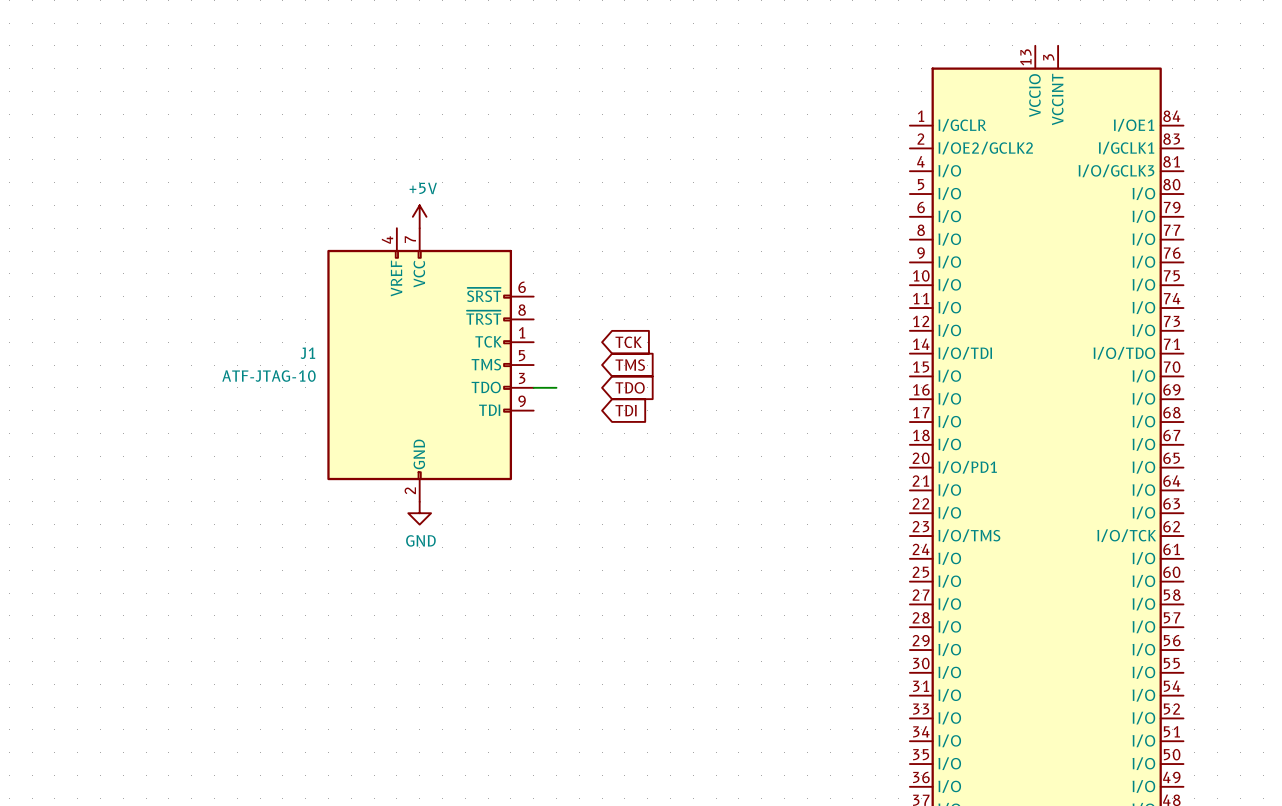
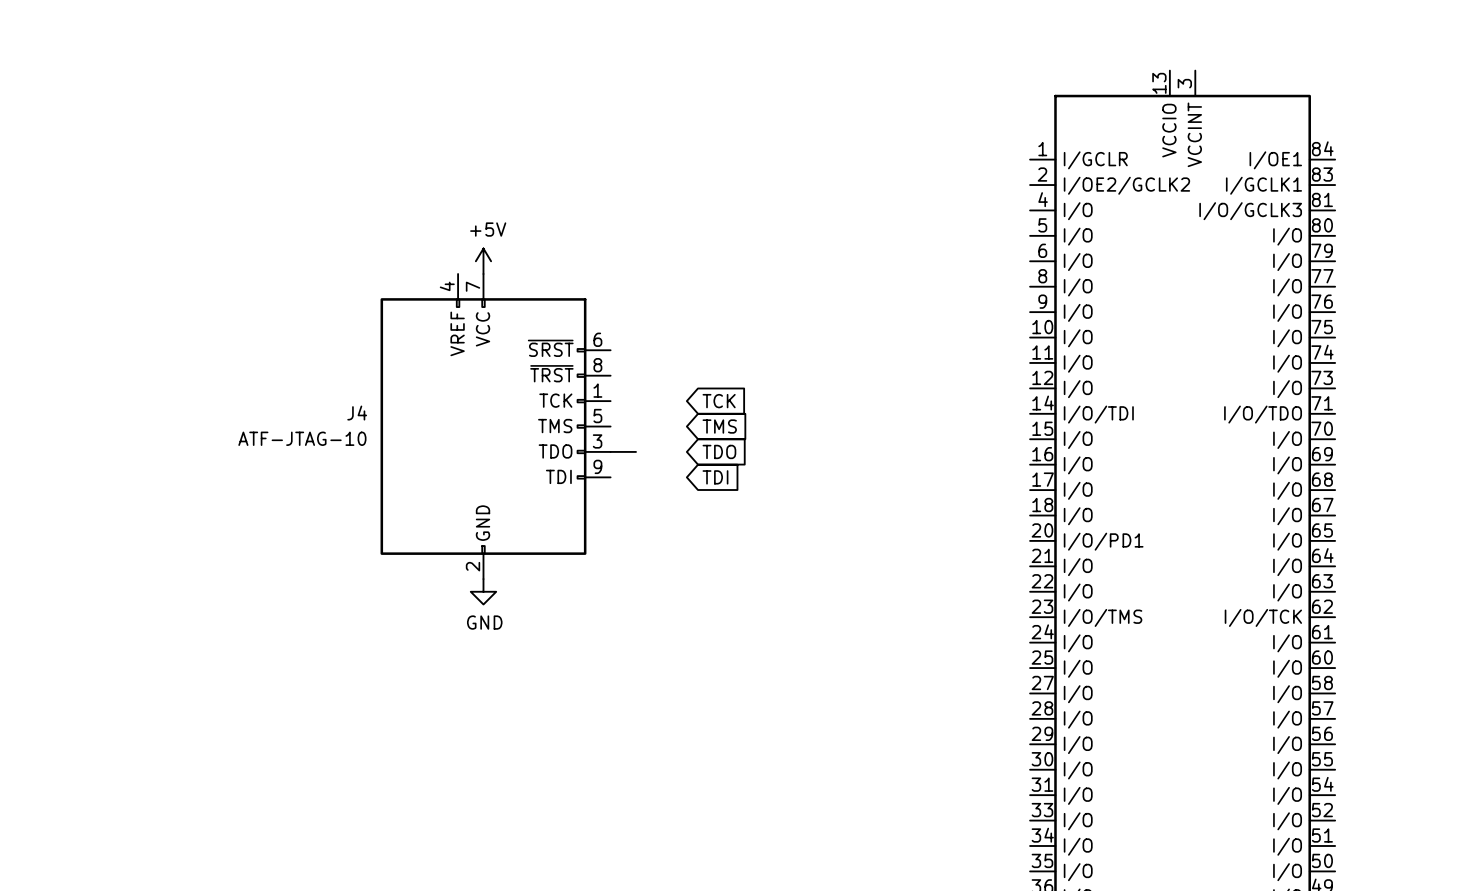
J1 name: J1 (307, 353) -> J4 (357, 413)

